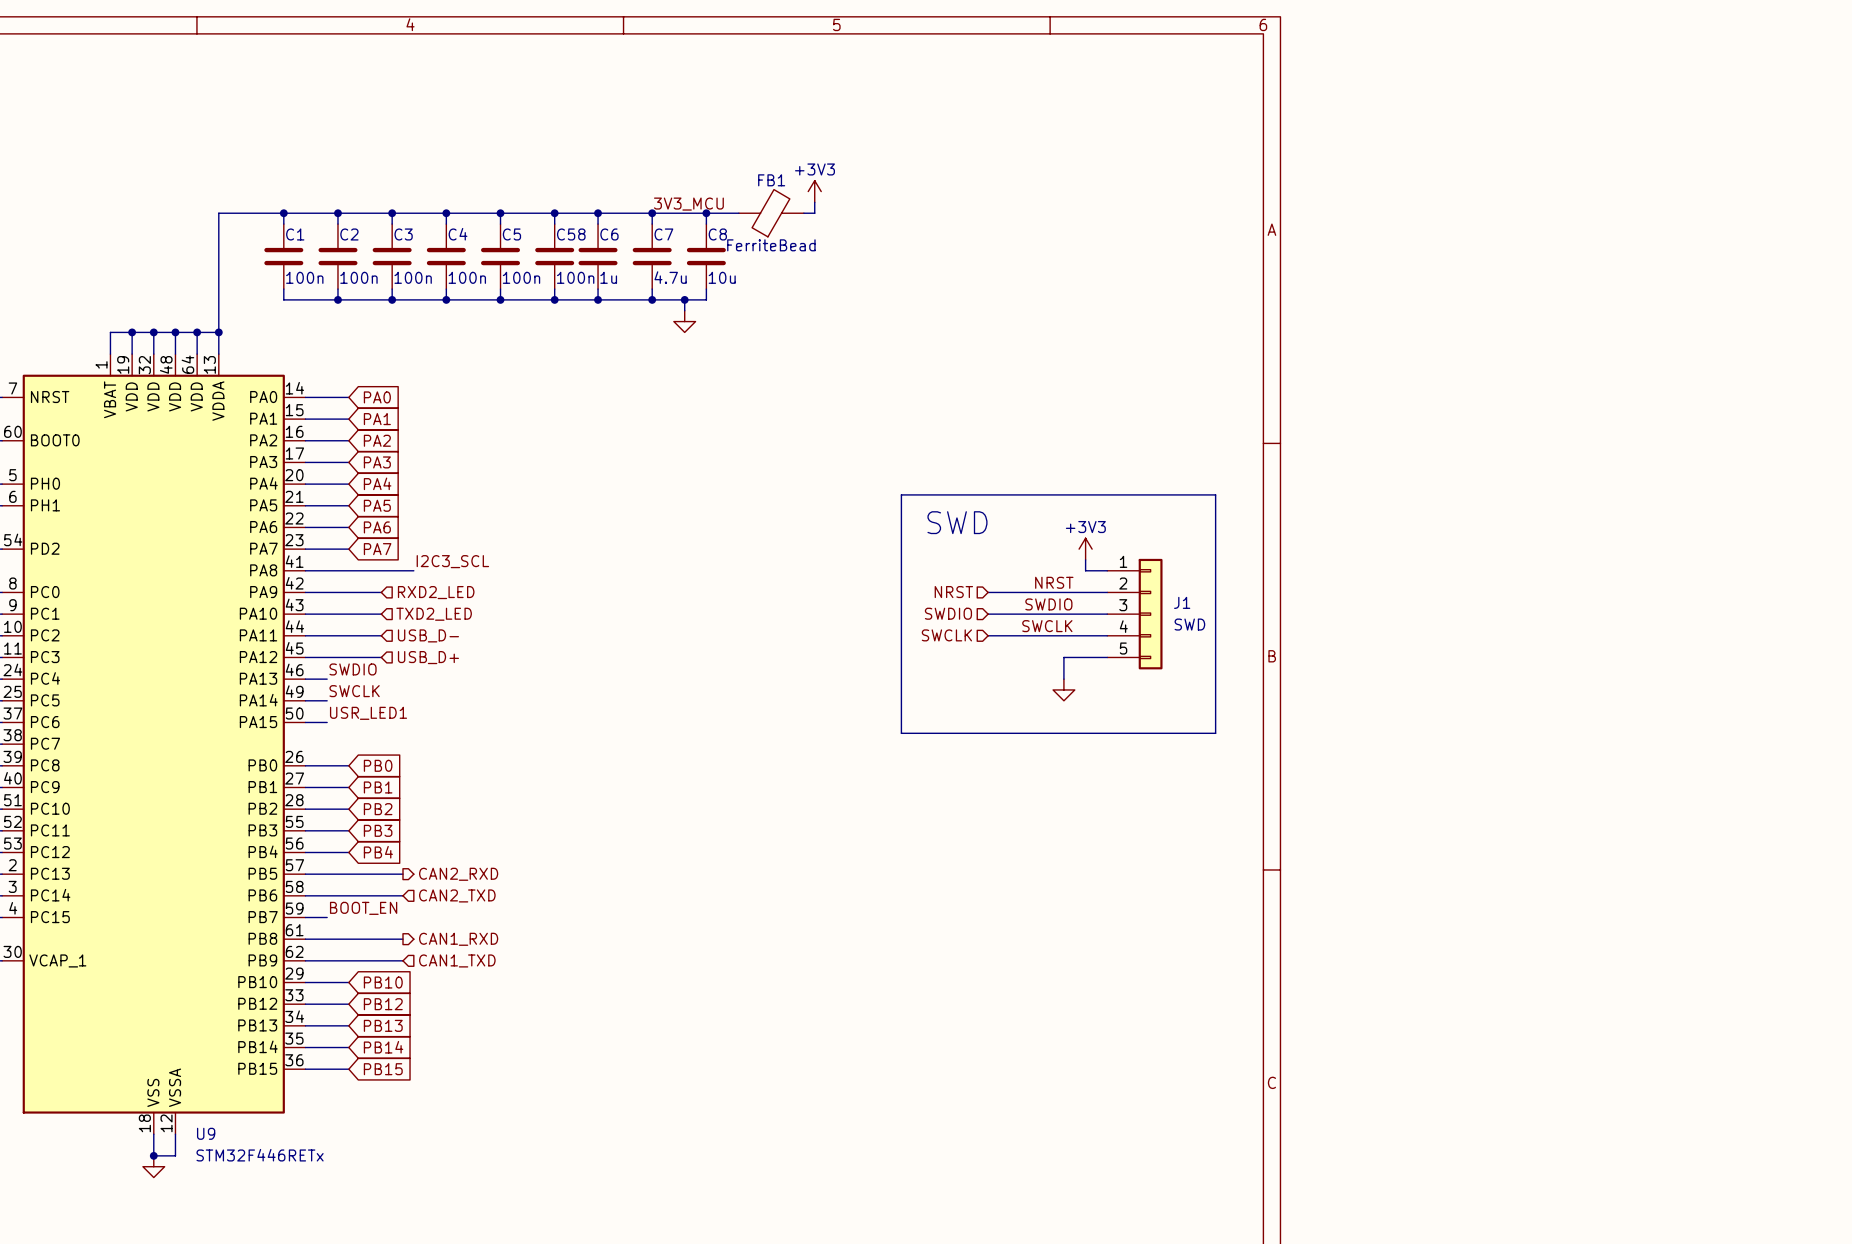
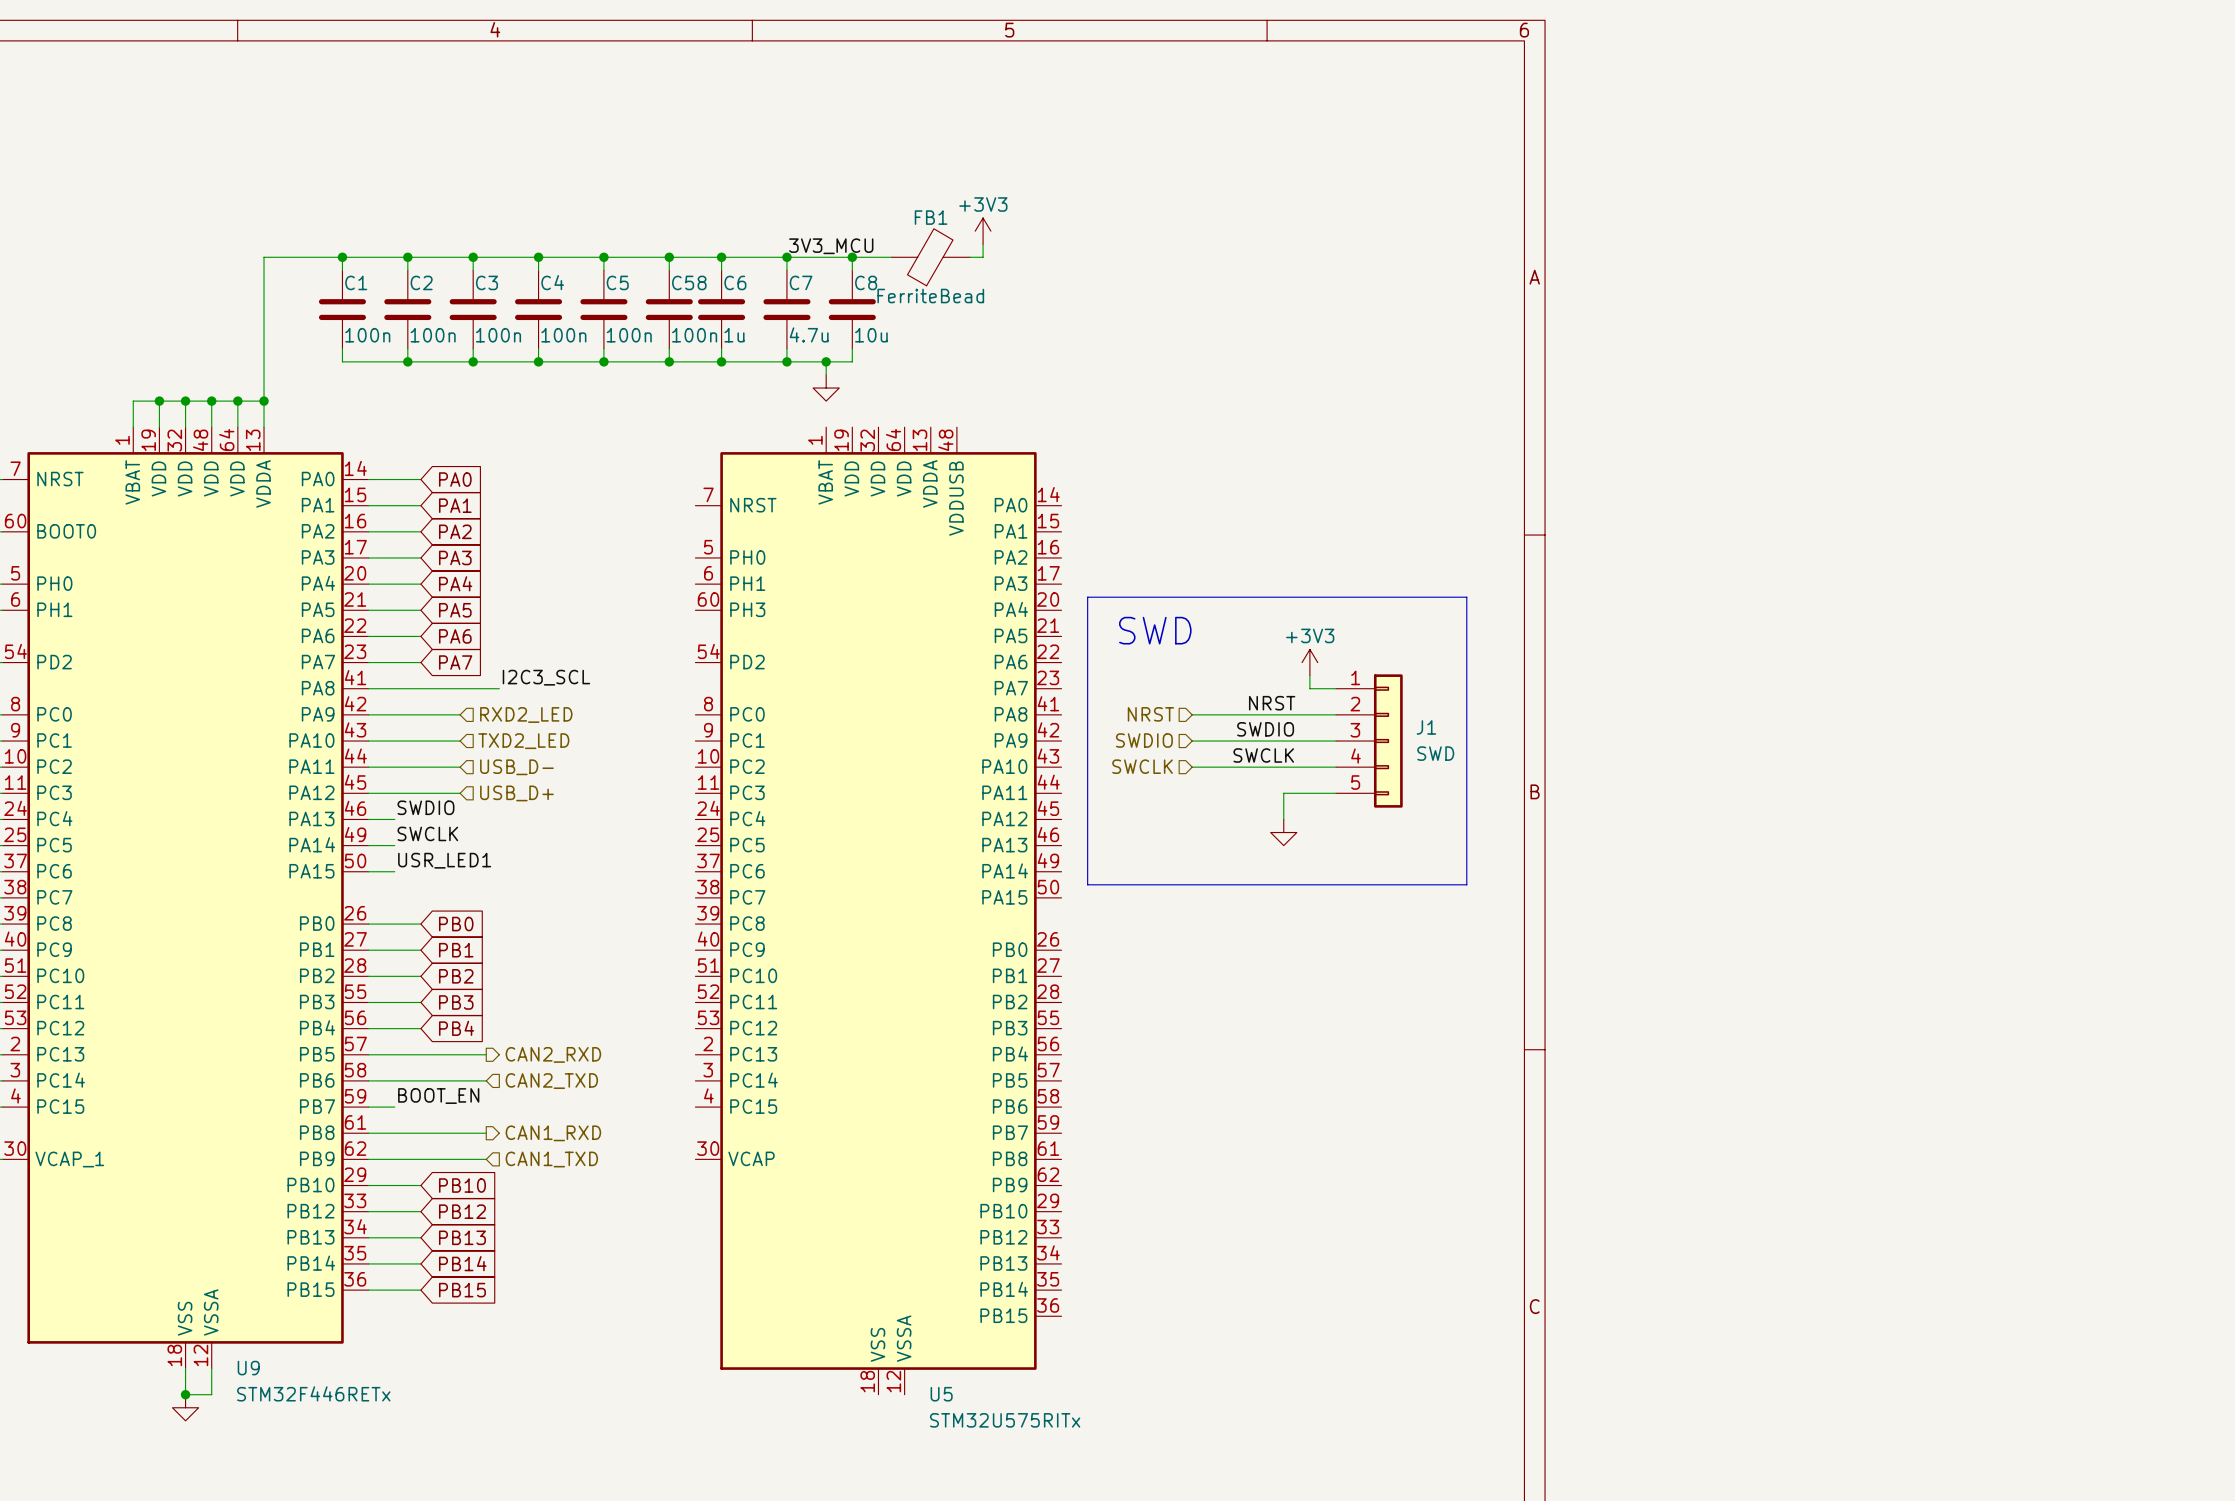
U5: none -> STM32U575RITx (878, 910)

